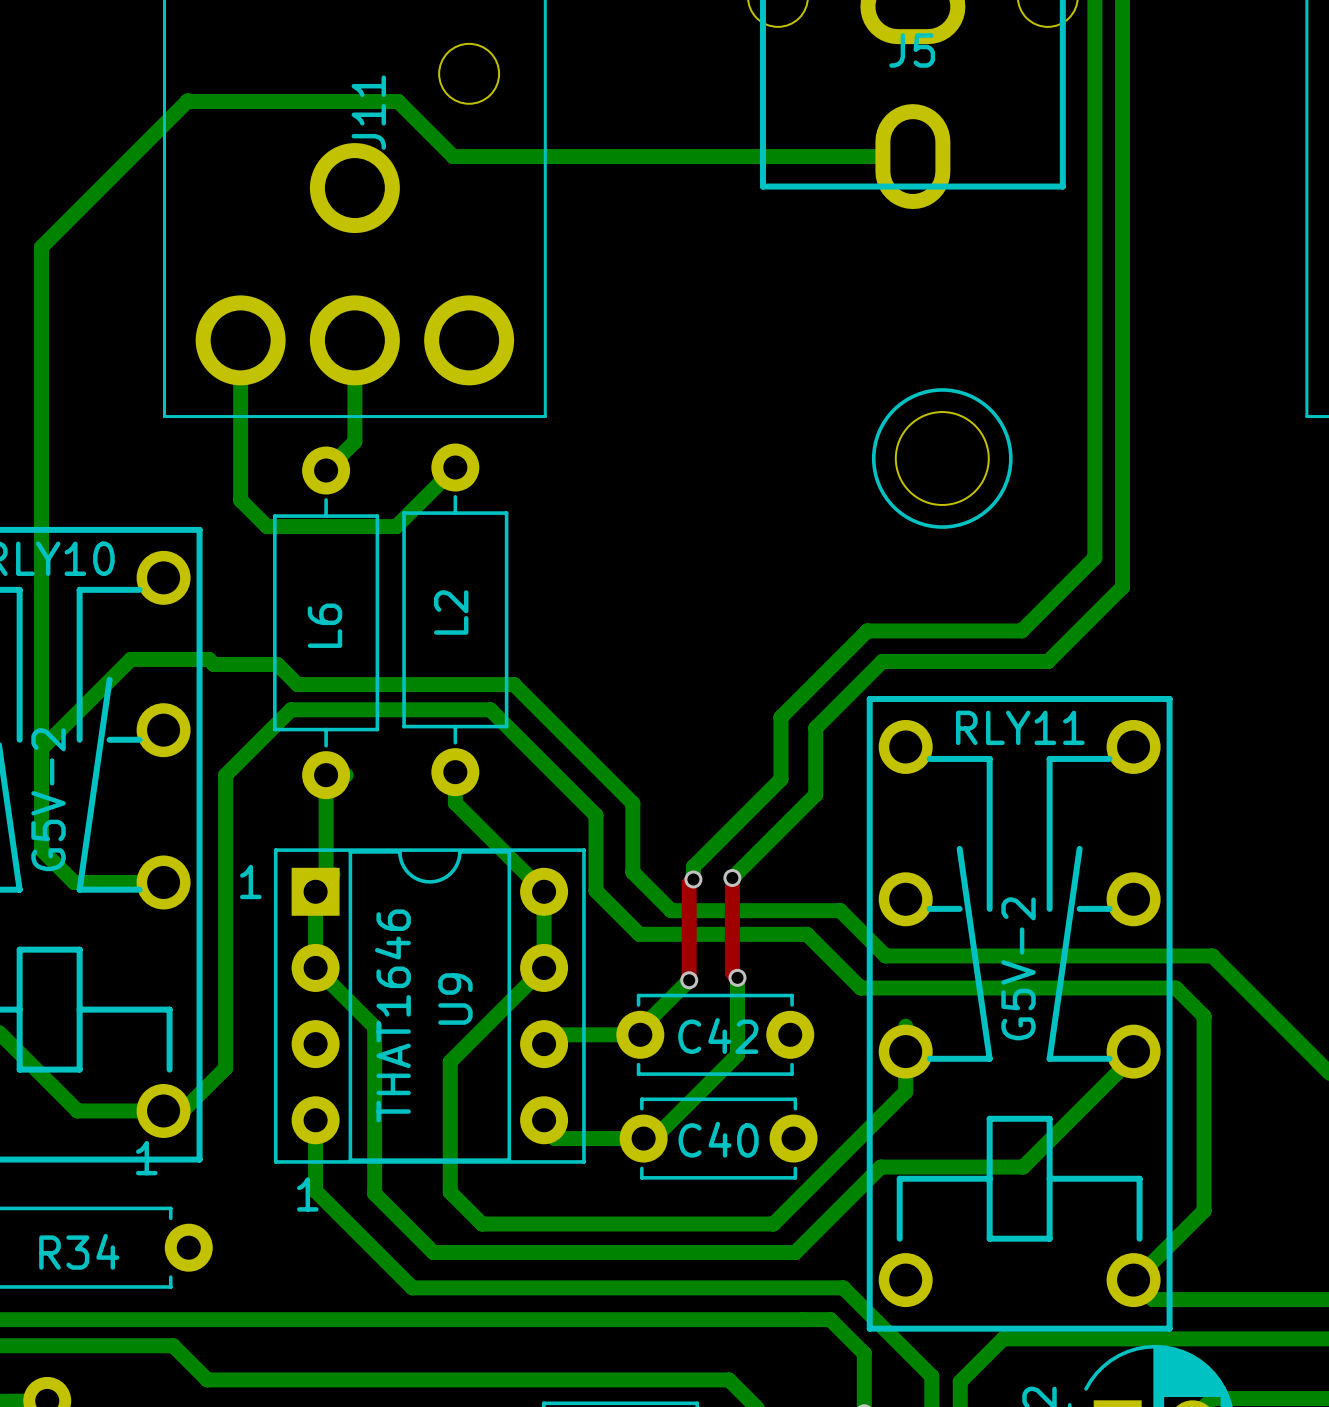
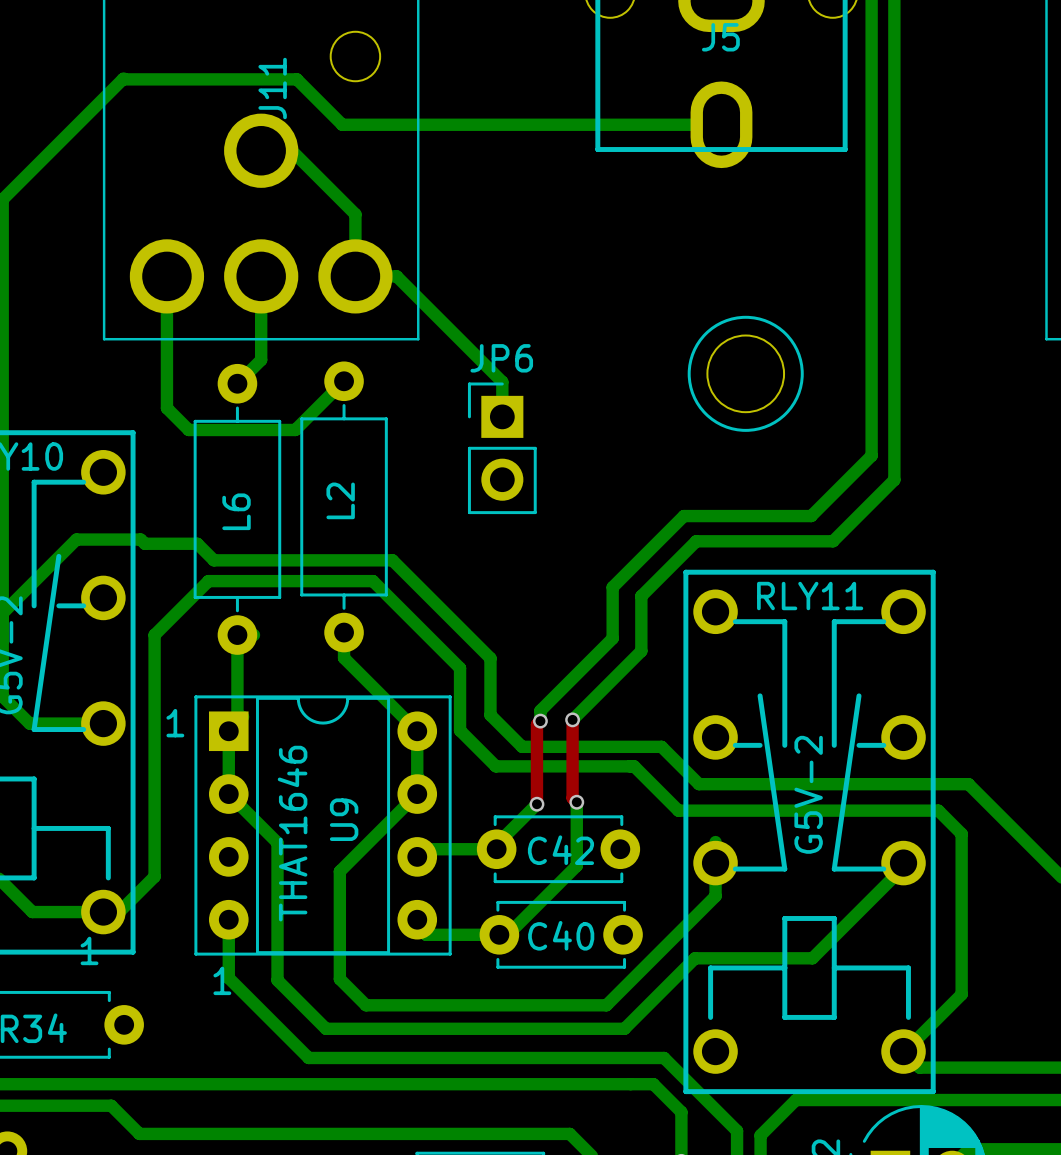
bottom track: none -> (261, 150) (291, 150) (355, 214) (355, 276) (396, 276) (502, 382) (502, 416)
JP6: none -> (502, 448)

